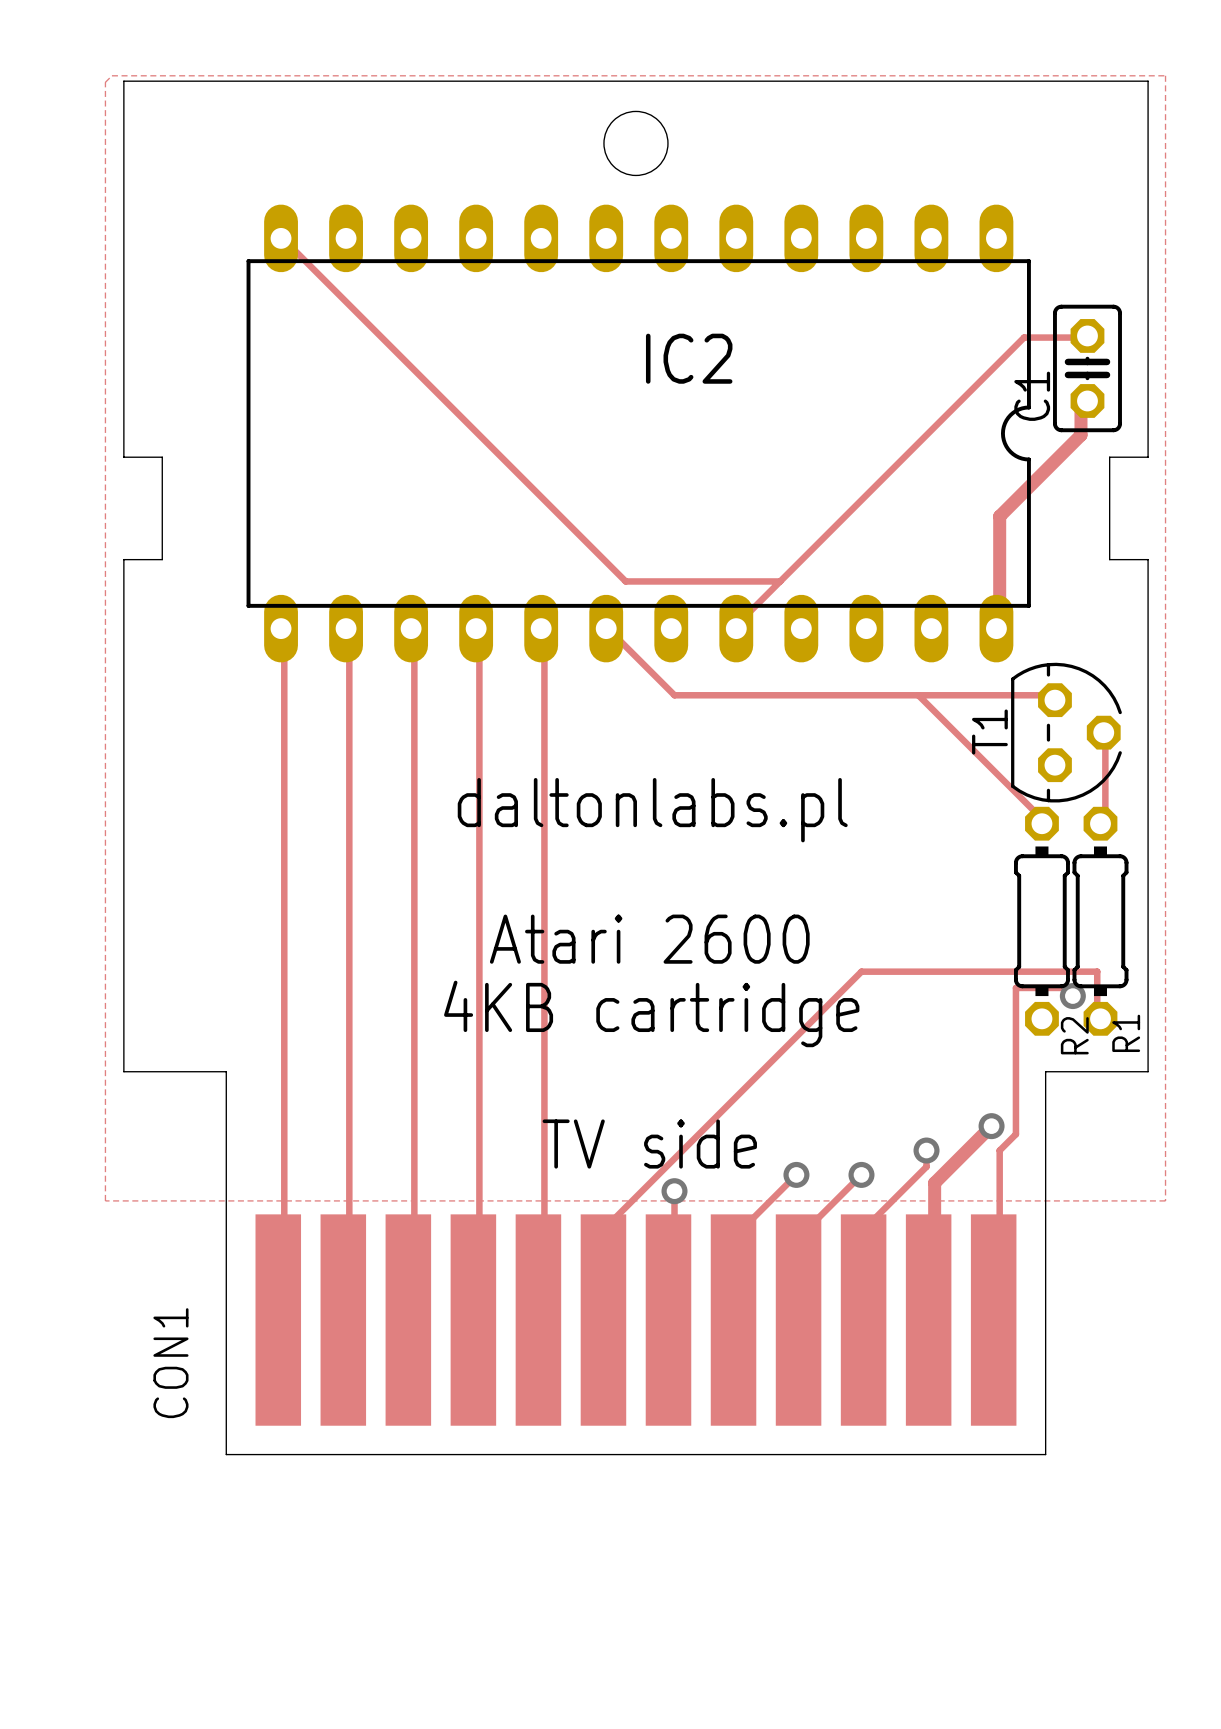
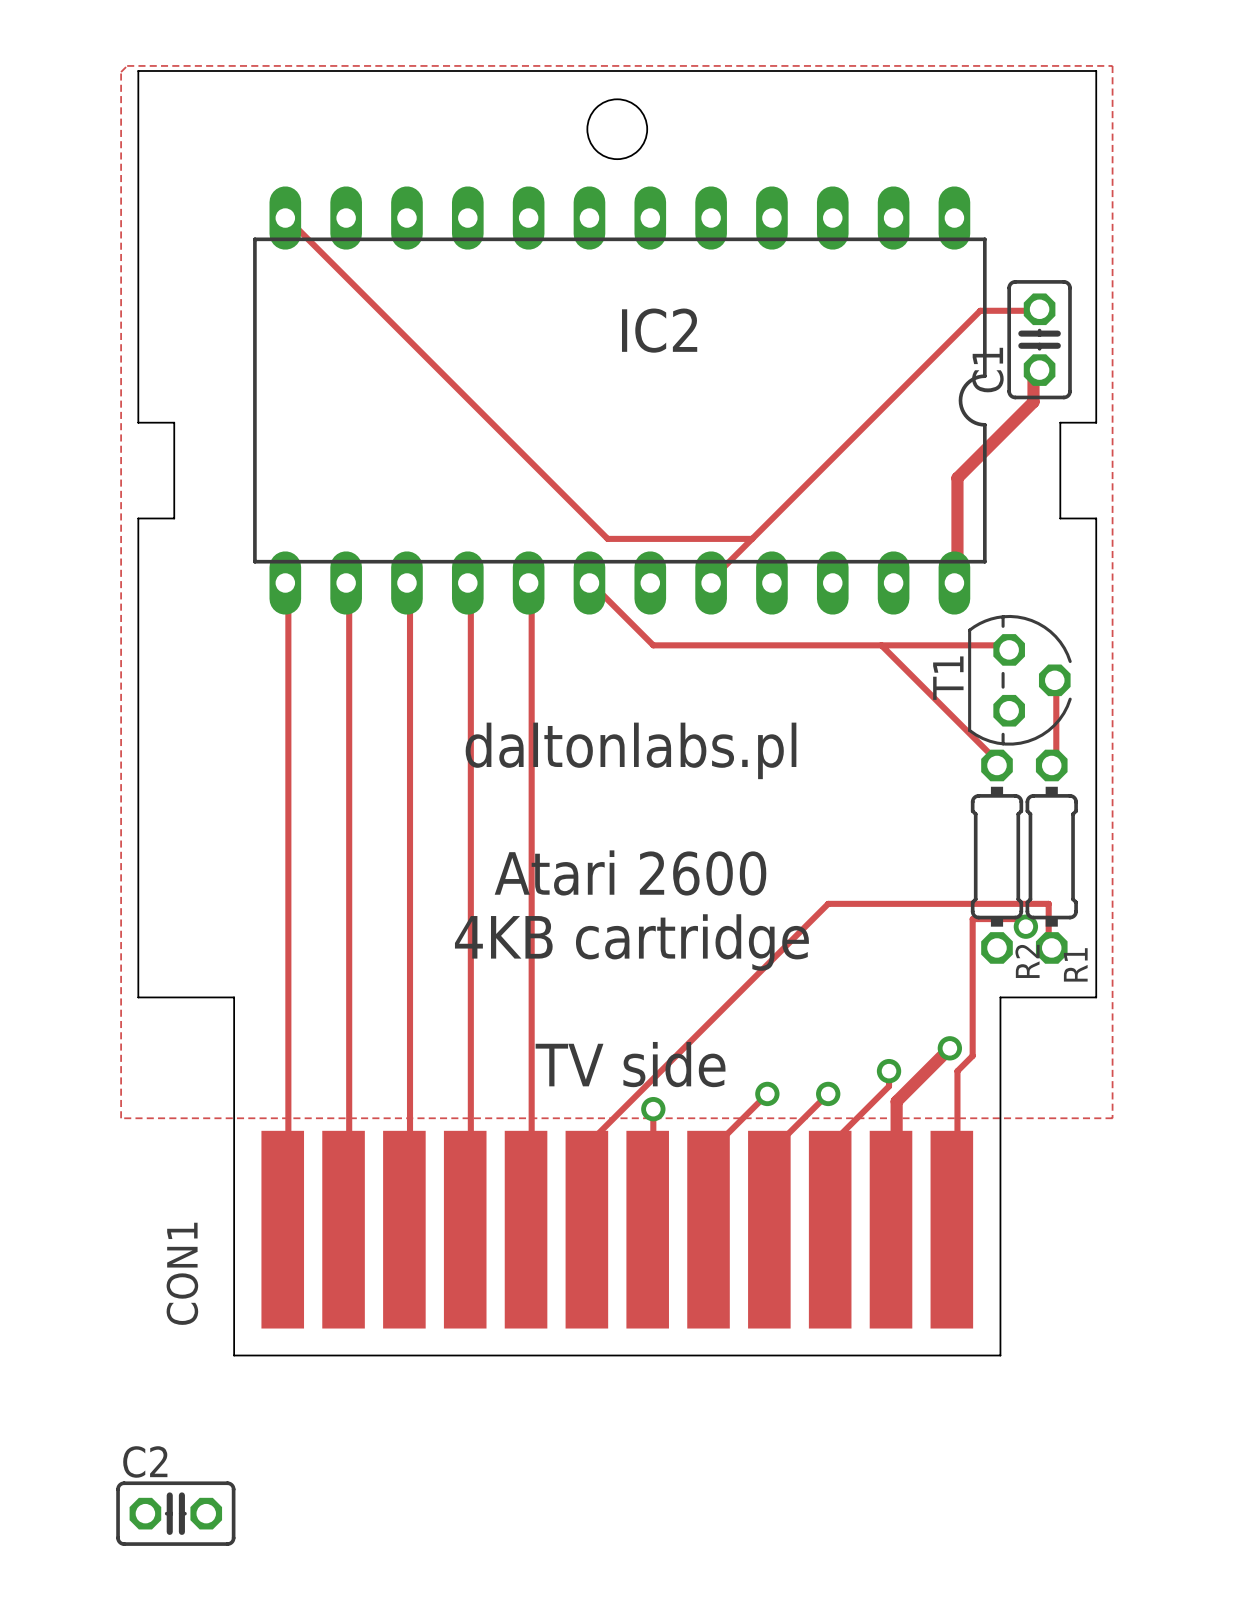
C2: none -> (175, 1513)

